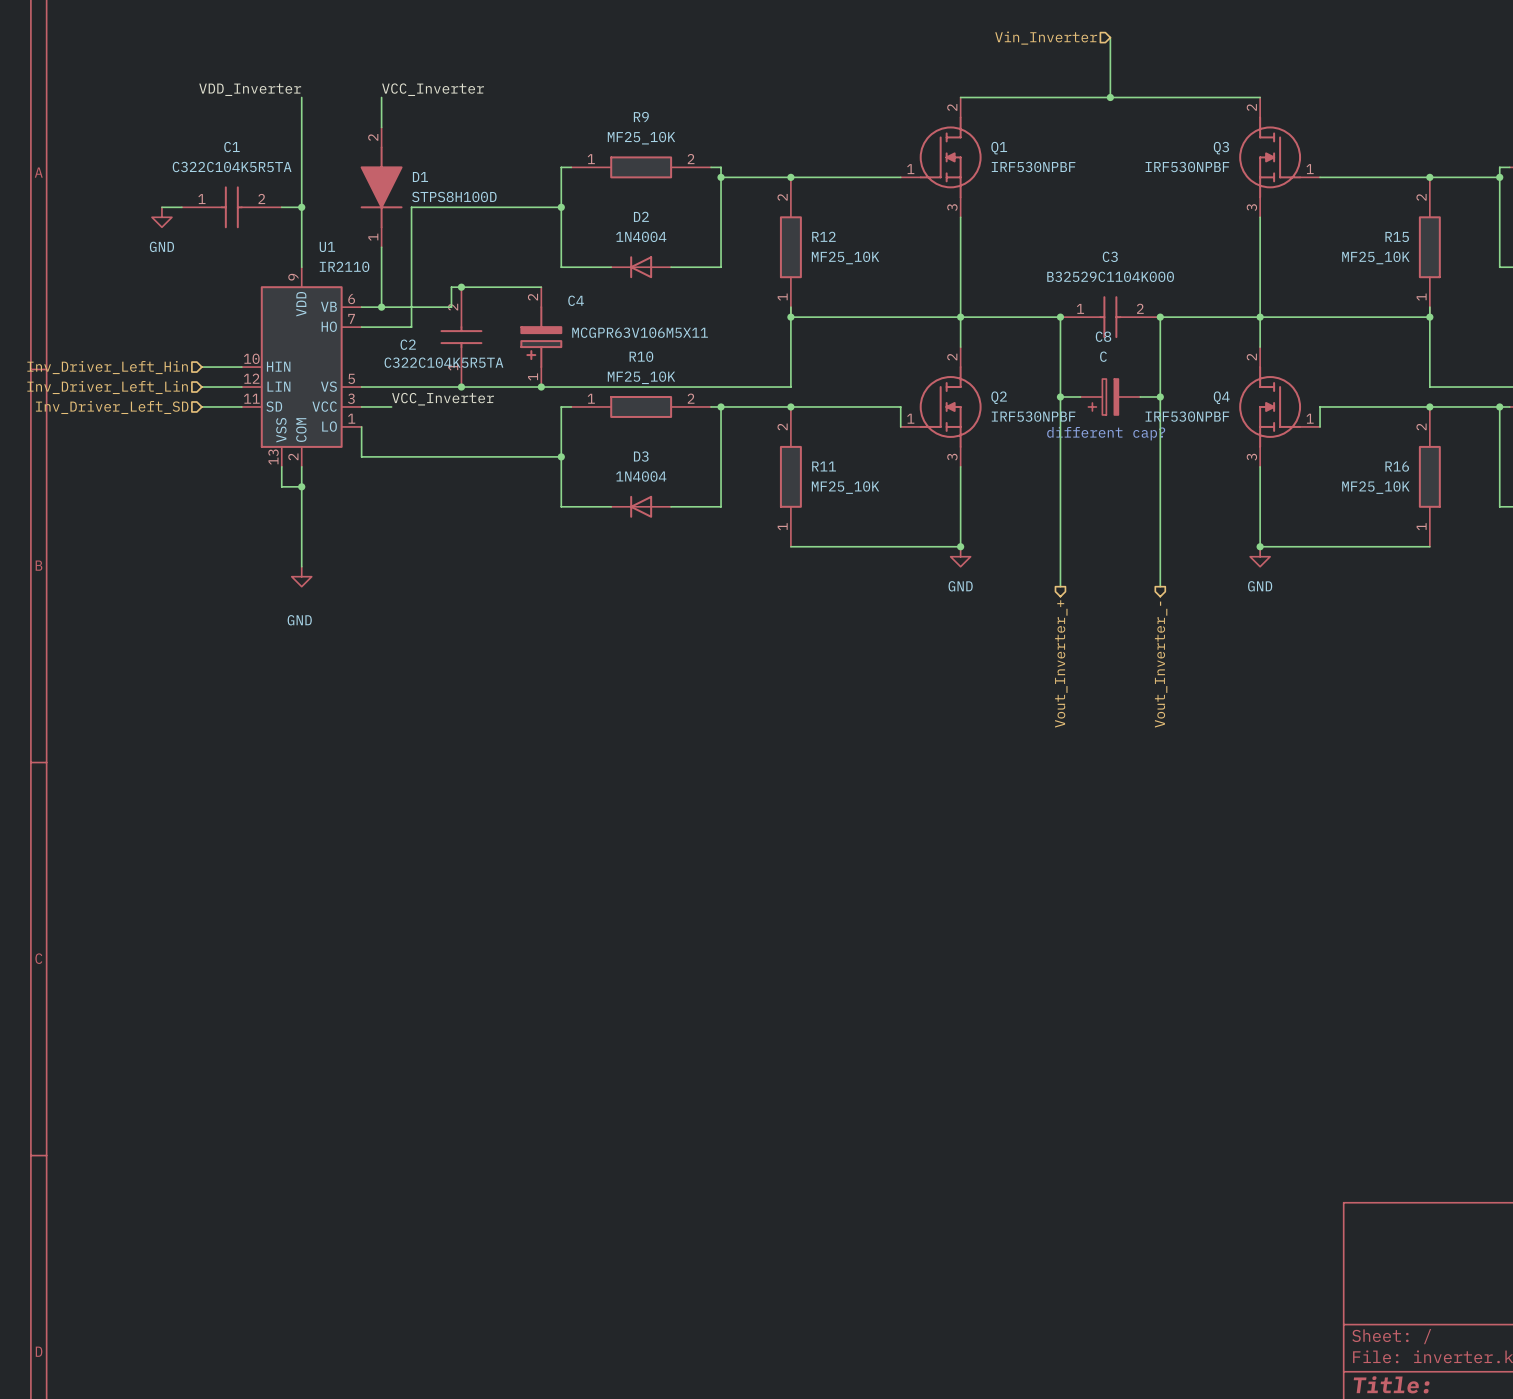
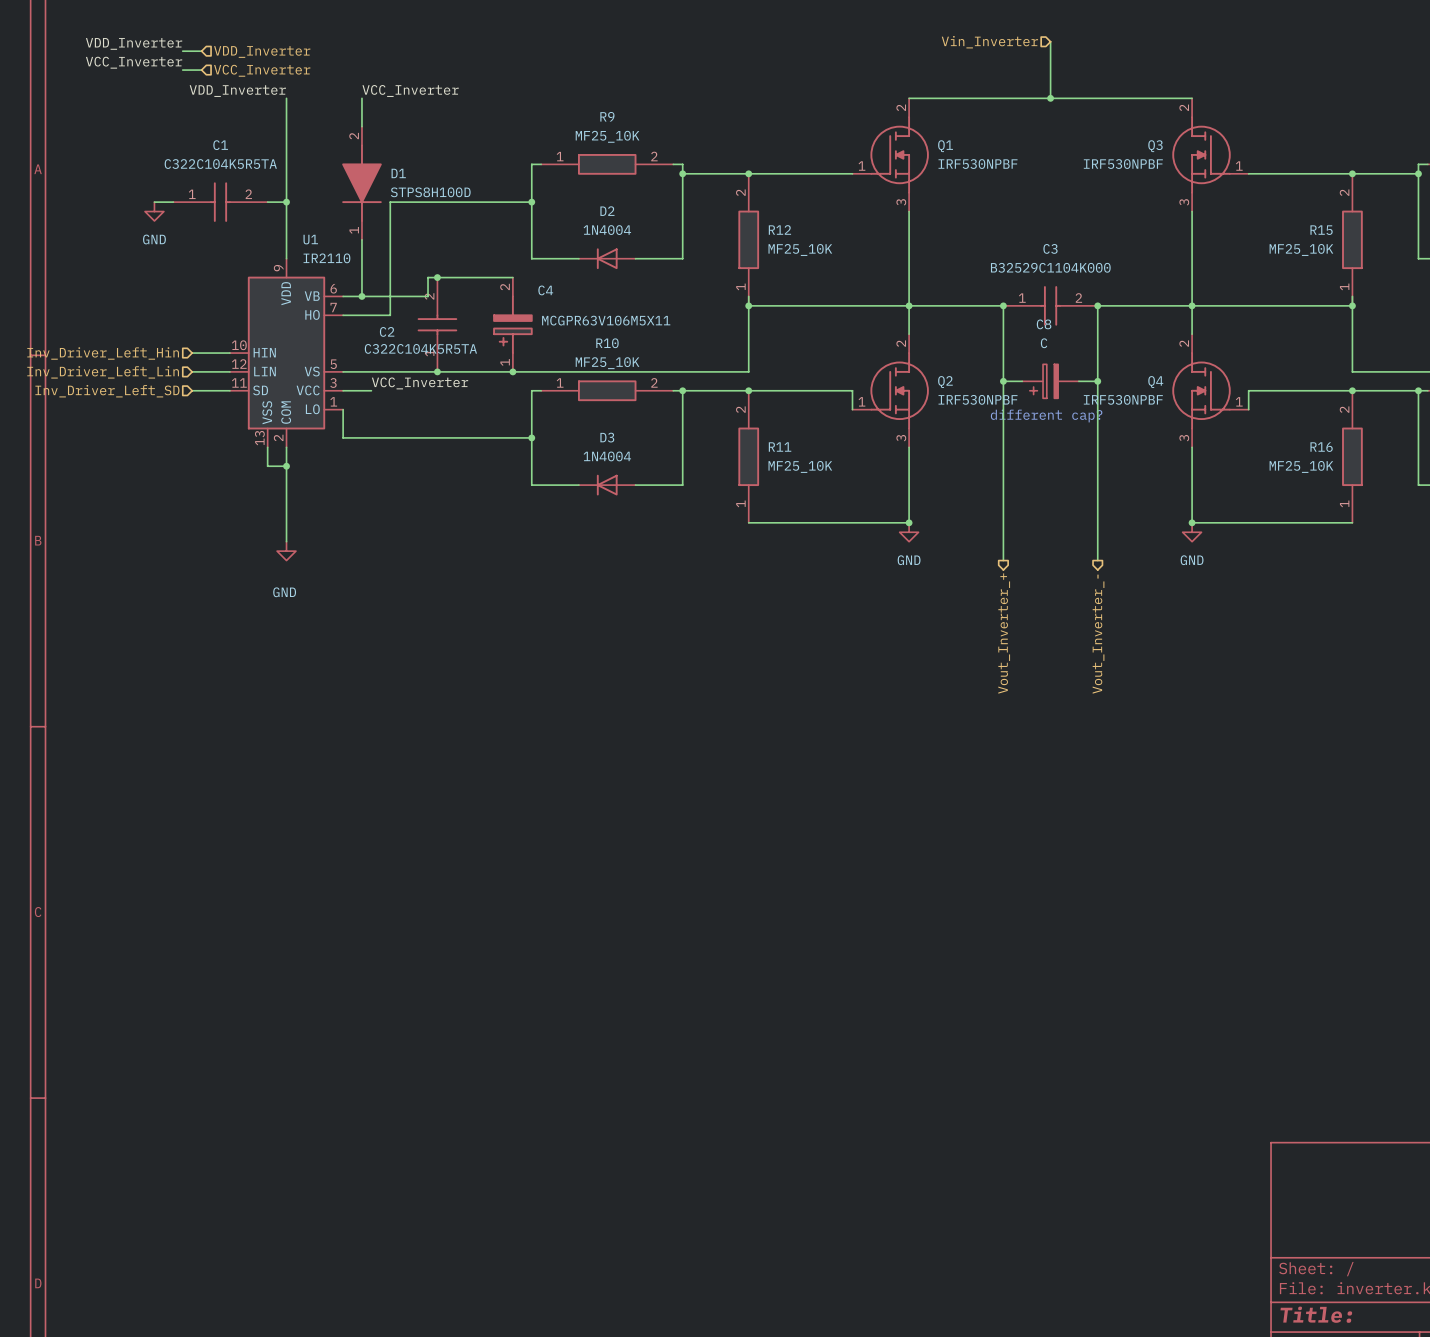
label: none -> VDD_Inverter (134, 43)
wire: none -> (182, 51) (201, 51)
hierarchical label: none -> VDD_Inverter (262, 51)
label: none -> VCC_Inverter (134, 62)
wire: none -> (182, 70) (201, 70)
hierarchical label: none -> VCC_Inverter (262, 70)

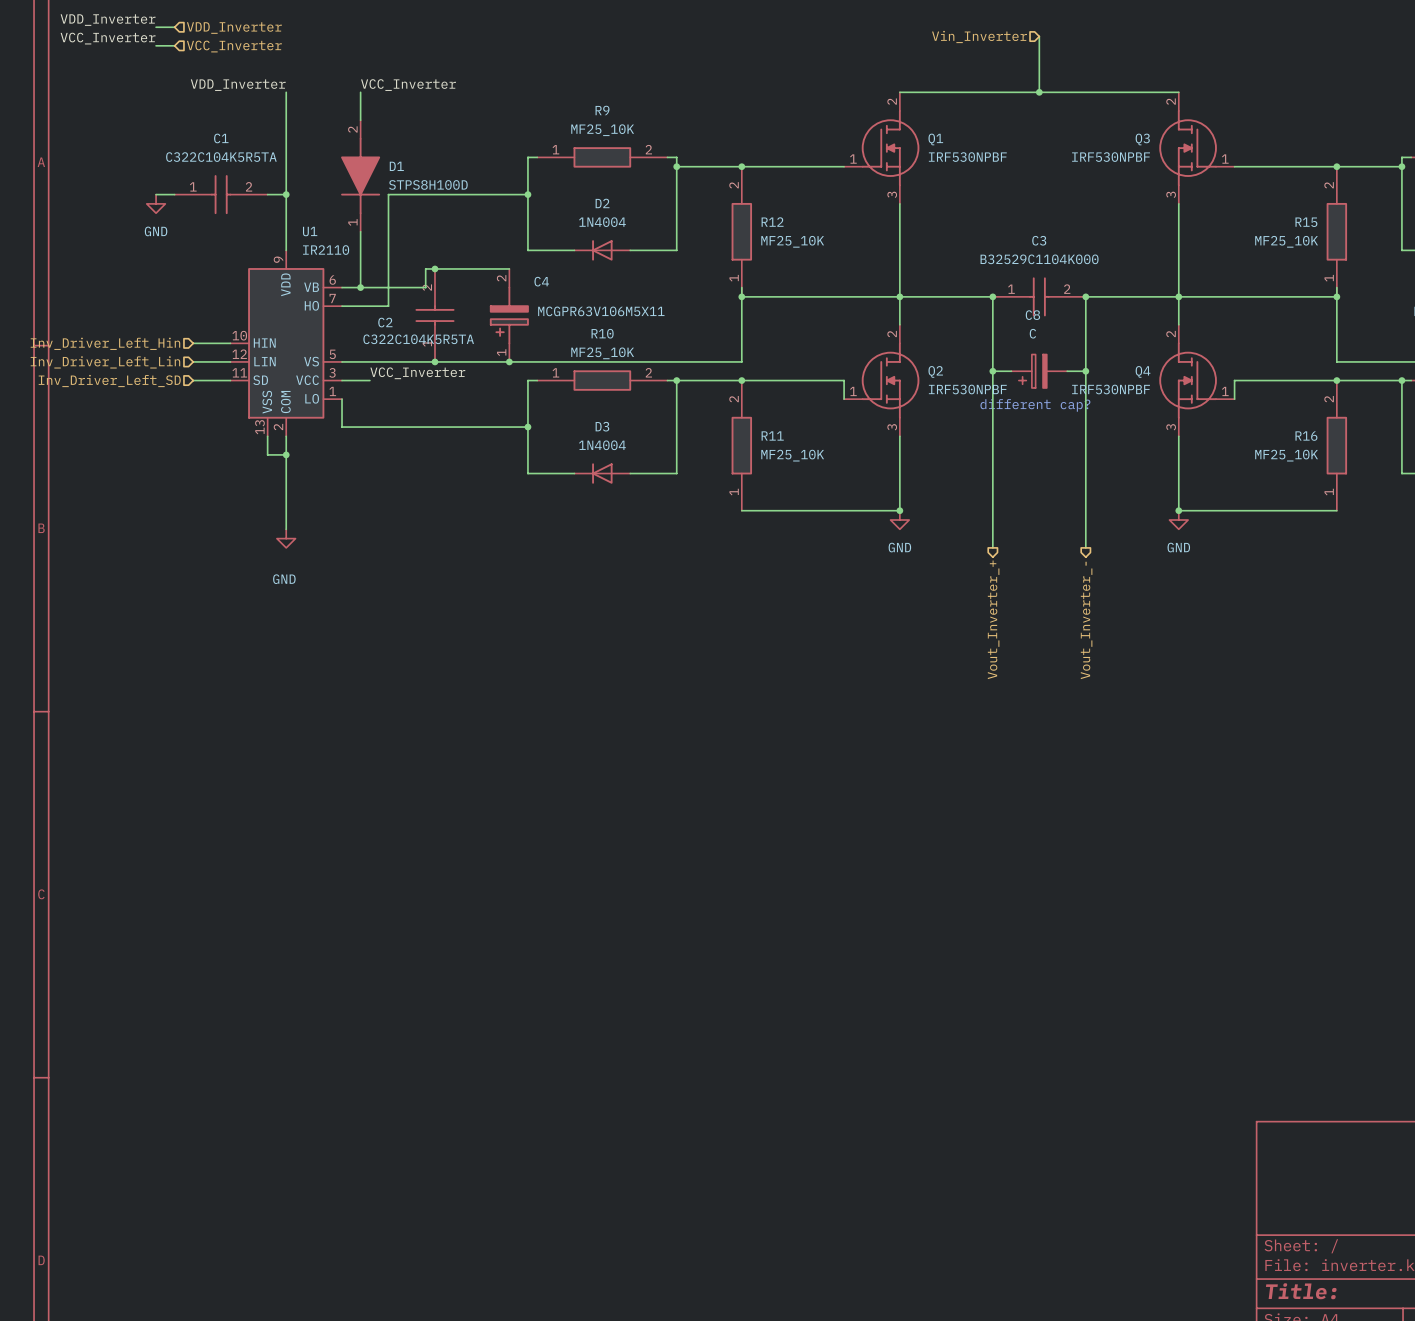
label position: VDD_Inverter (134, 43) -> VDD_Inverter (108, 20)
wire: (182, 51) (201, 51) -> (156, 27) (174, 27)
hierarchical label position: VDD_Inverter (262, 51) -> VDD_Inverter (234, 28)
label position: VCC_Inverter (134, 62) -> VCC_Inverter (108, 38)
wire: (182, 70) (201, 70) -> (156, 45) (174, 45)
hierarchical label position: VCC_Inverter (262, 70) -> VCC_Inverter (234, 46)

